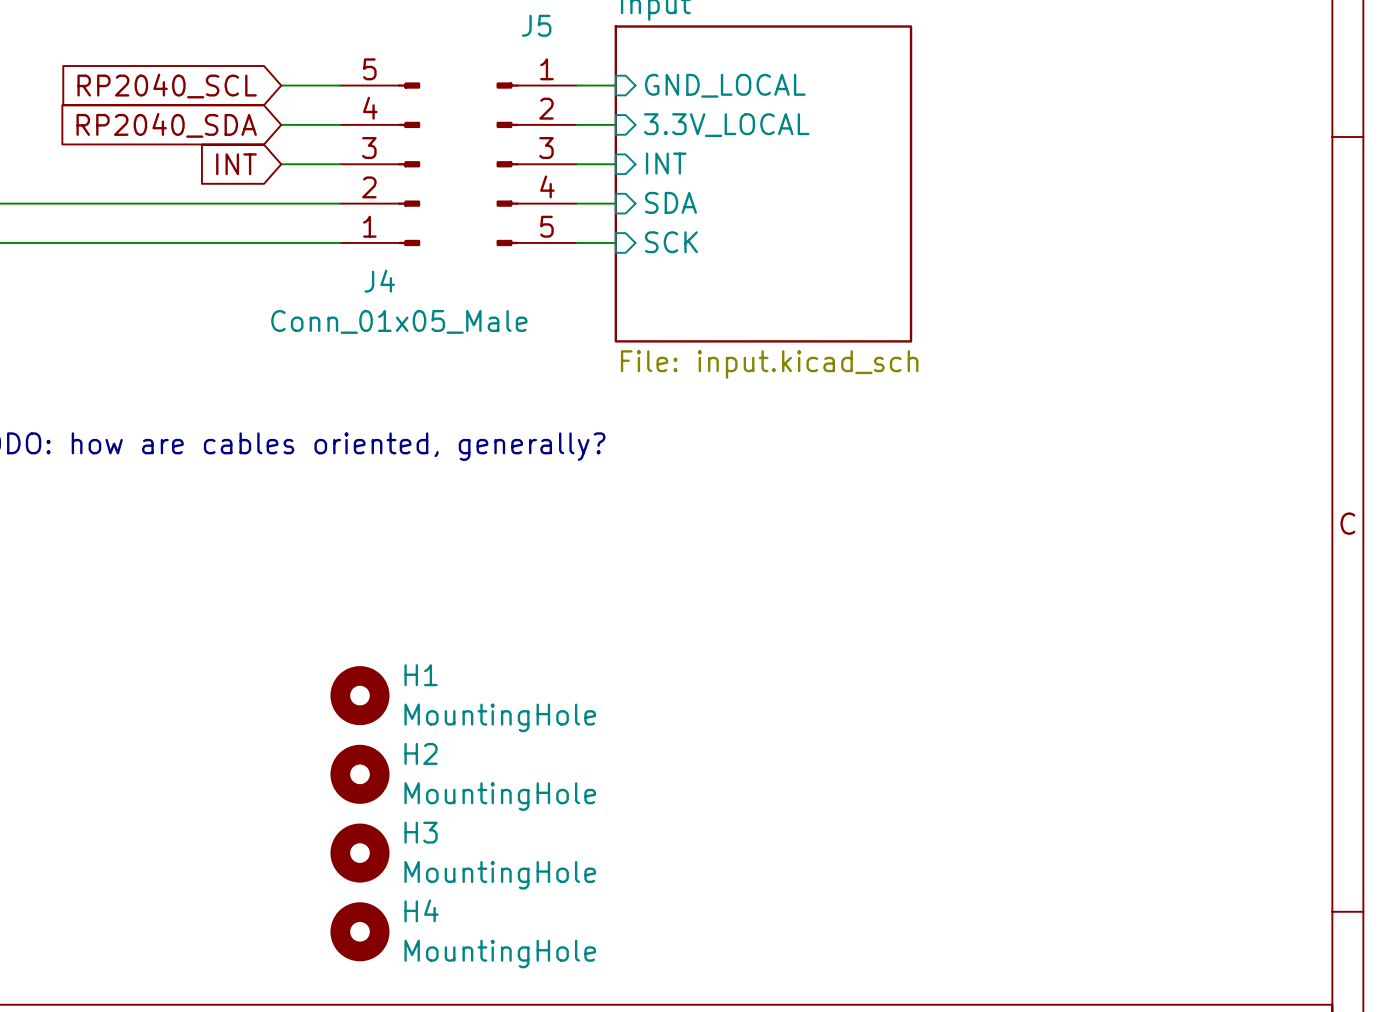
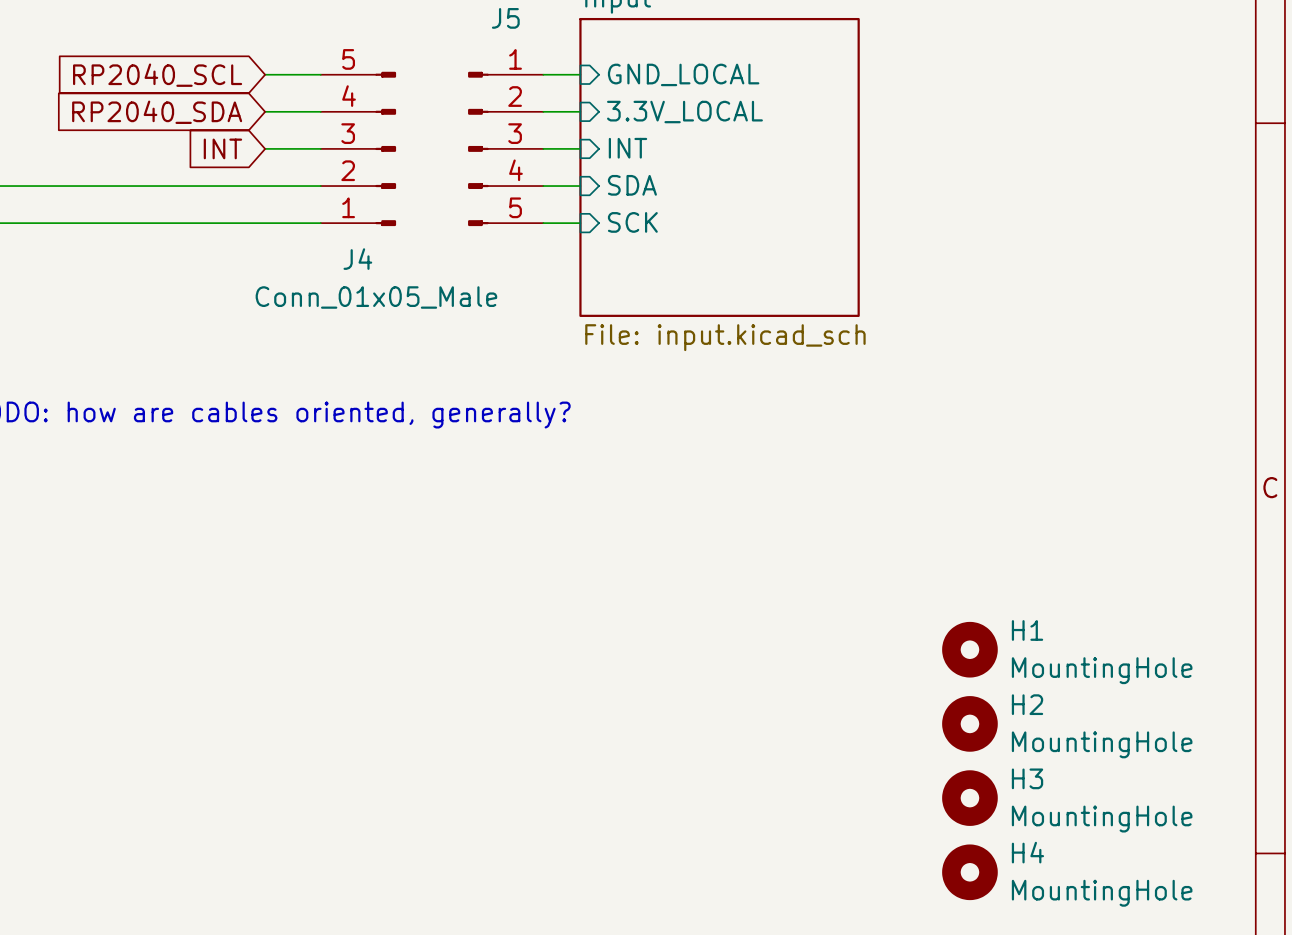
H1 position: (359, 695) -> (969, 649)
H2 position: (359, 774) -> (969, 723)
H3 position: (359, 853) -> (969, 798)
H4 position: (359, 931) -> (969, 872)

